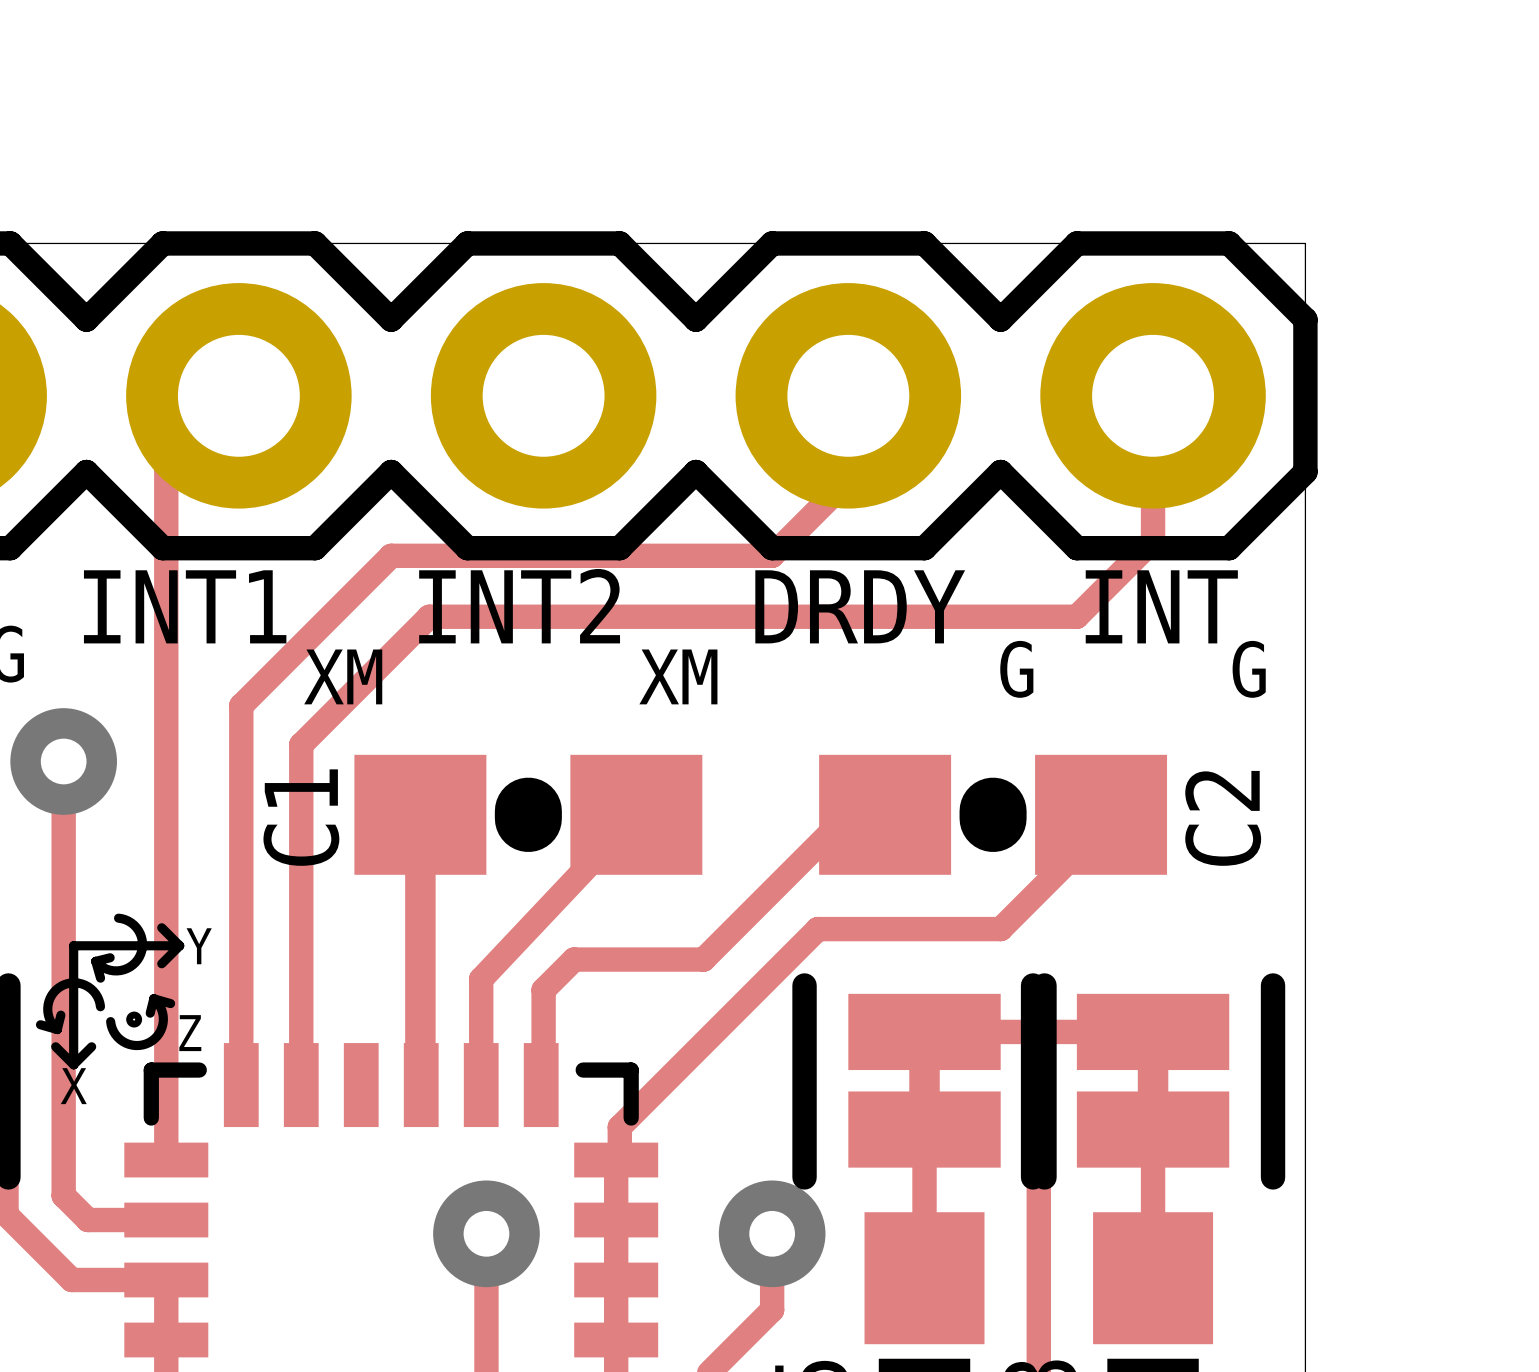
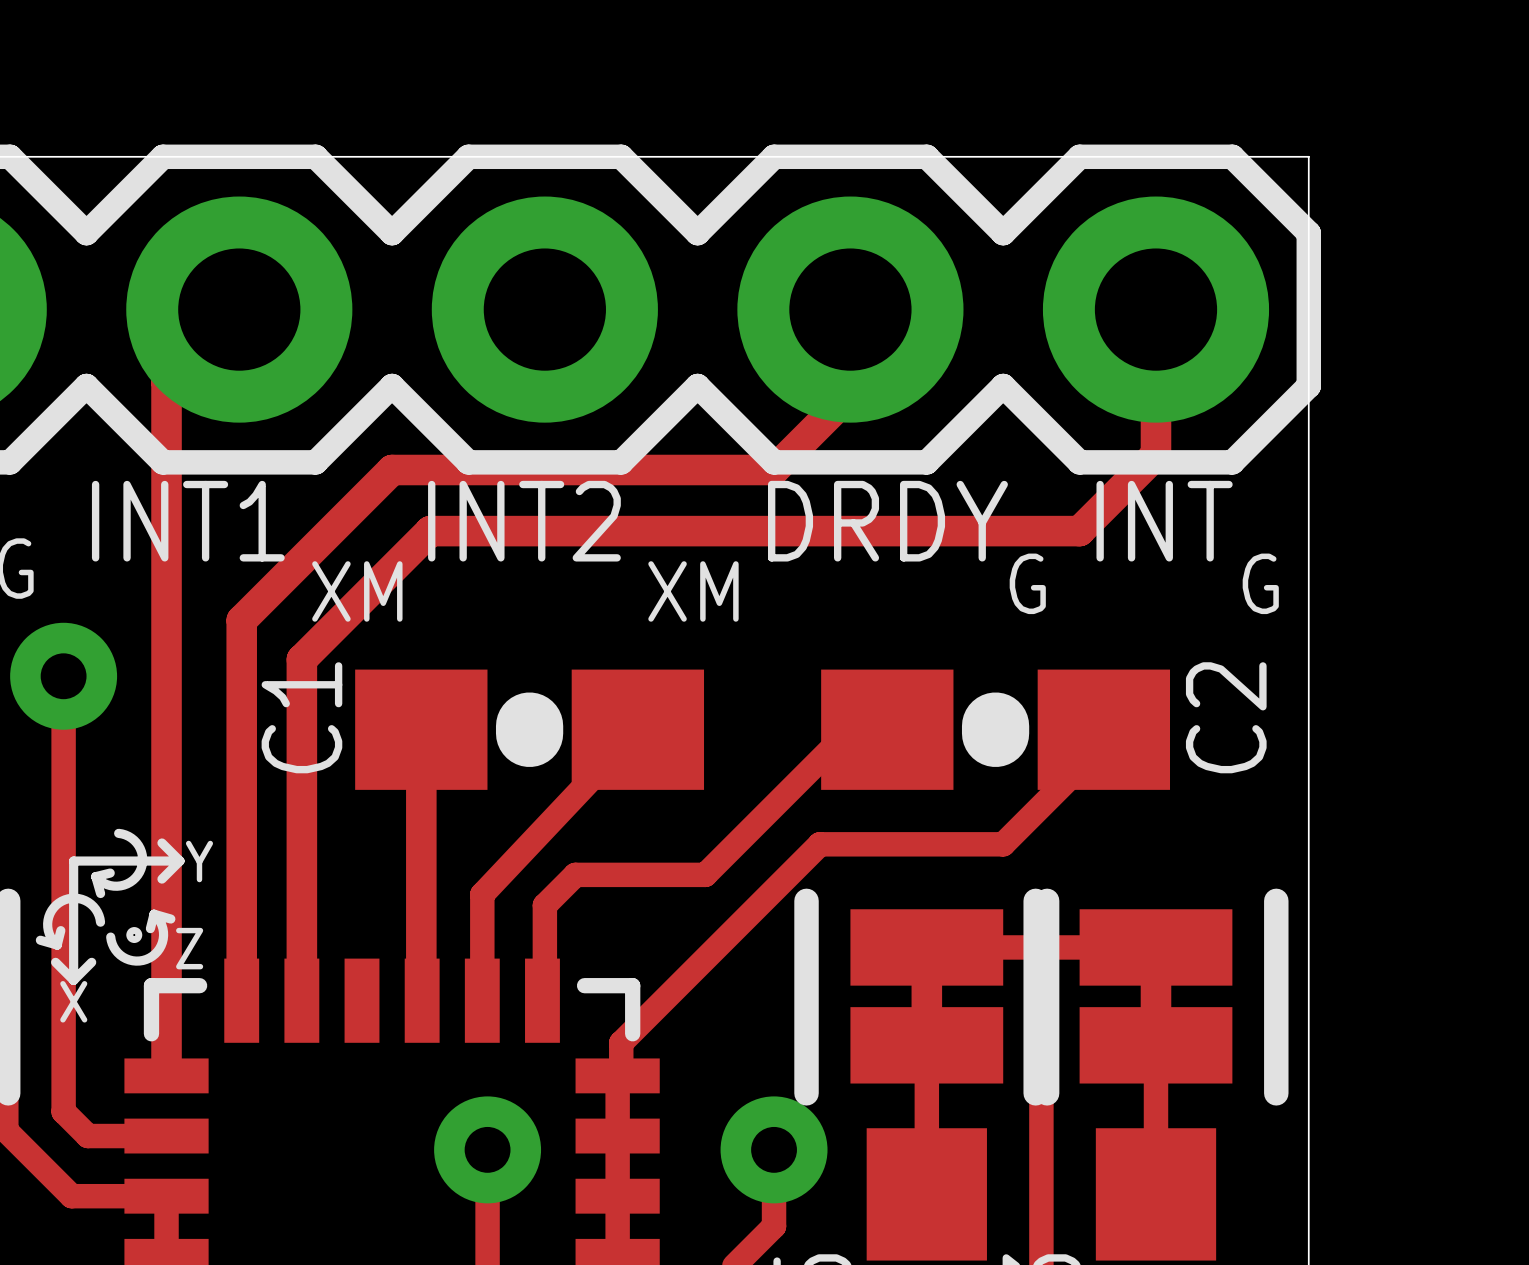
track width: thin (238, 395) (166, 468) (166, 1160) -> thick (239, 309) (166, 382) (166, 1075)
track width: thin (848, 395) (848, 479) (772, 555) (391, 555) (241, 705) (241, 1085) -> thick (850, 309) (850, 393) (774, 470) (392, 470) (241, 620) (241, 1000)
track width: thin (1153, 395) (1153, 540) (1076, 616) (429, 616) (301, 744) (301, 1085) -> thick (1155, 309) (1155, 454) (1079, 531) (430, 531) (301, 659) (301, 1000)

